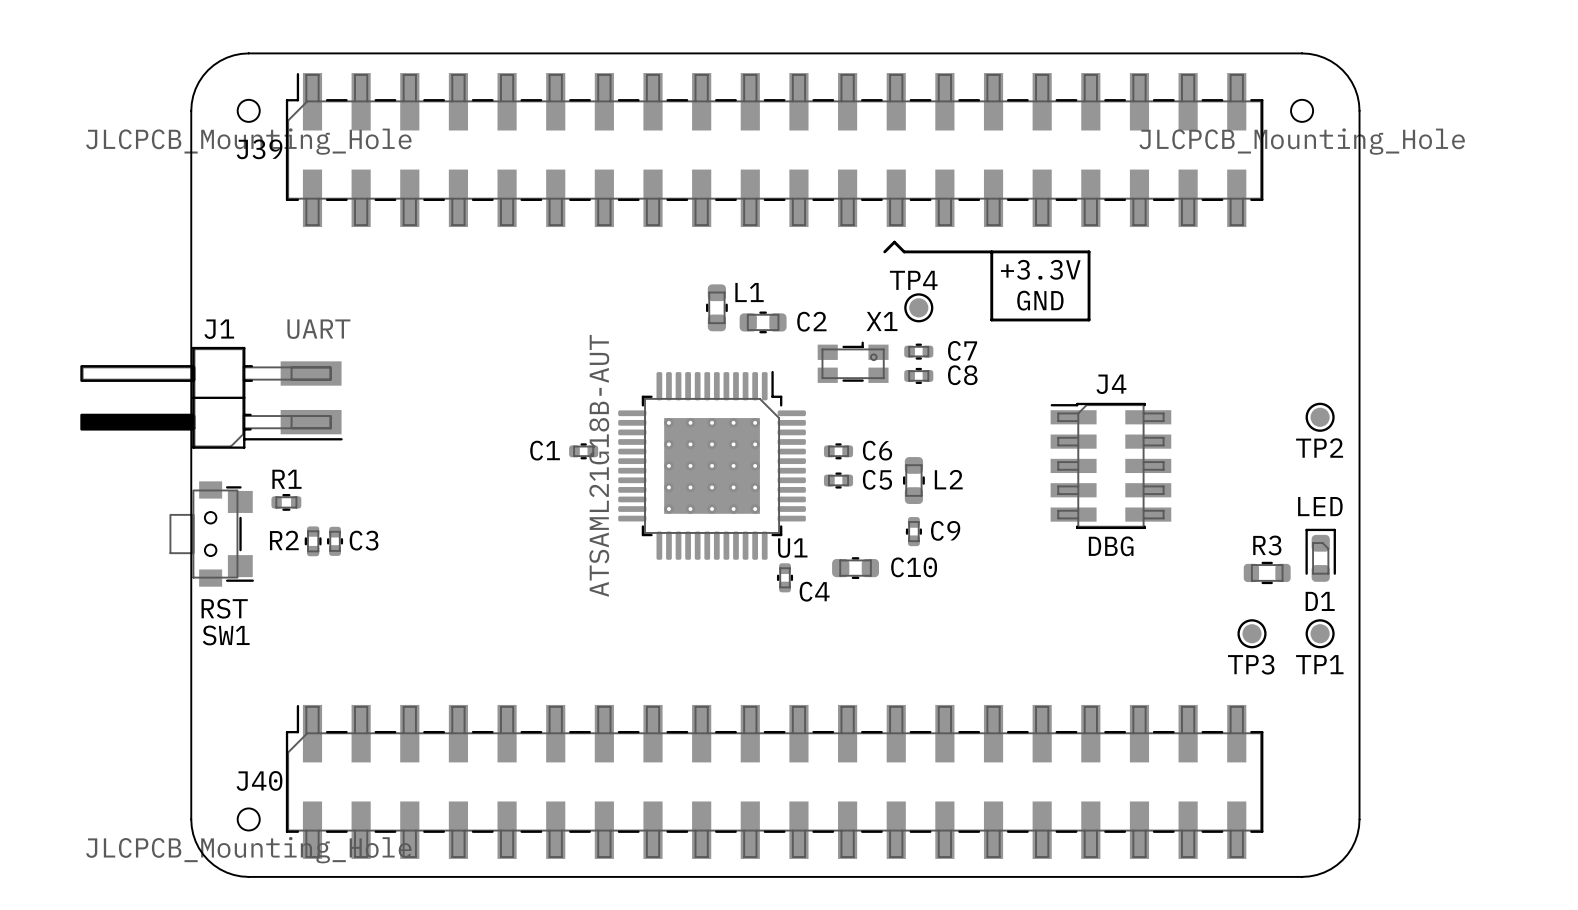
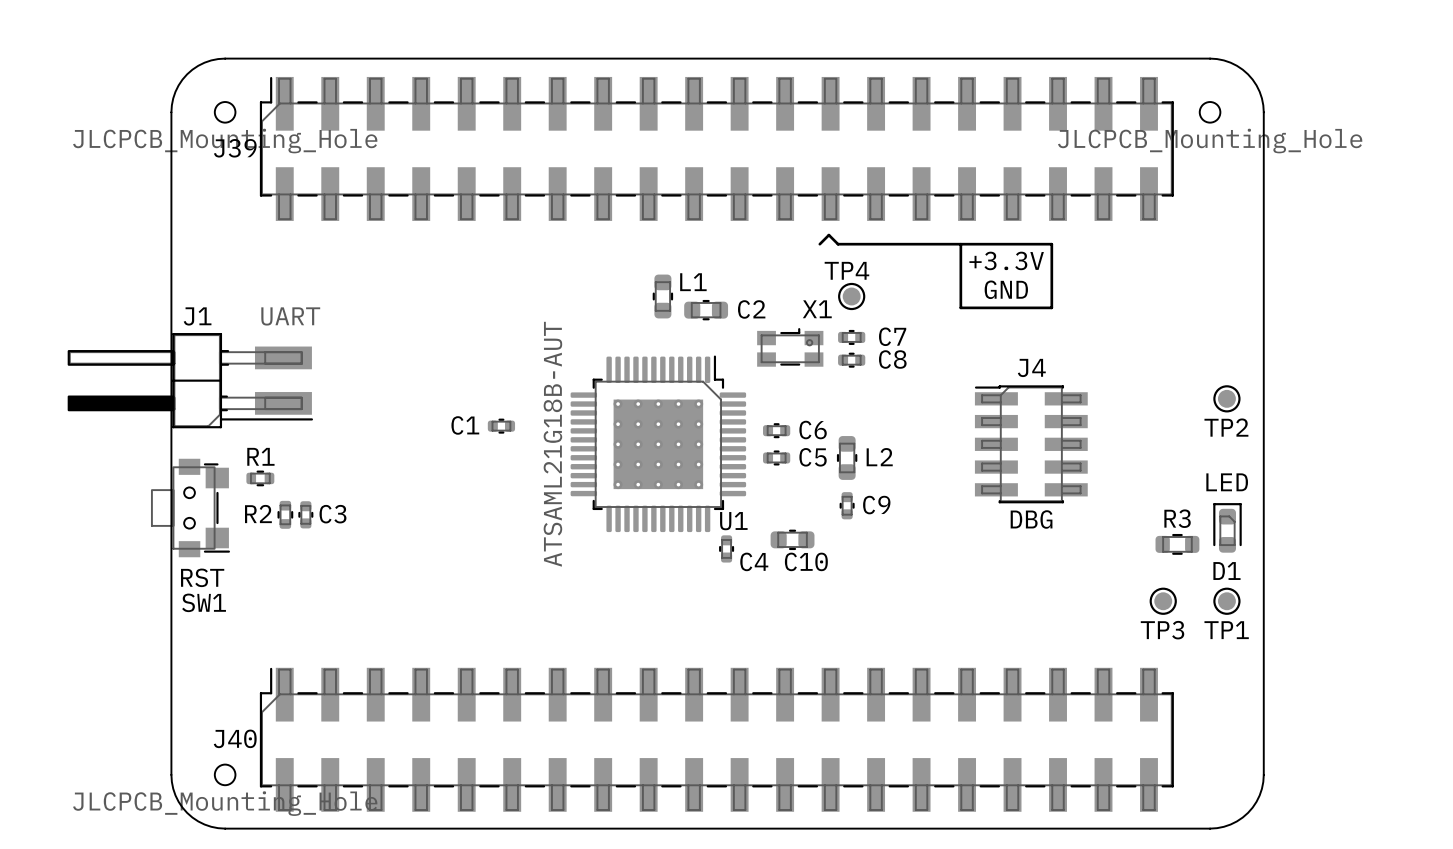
line: (991, 251) (991, 319) (1035, 319) -> (960, 244) (960, 307)
line: (1089, 251) (1089, 319) -> (1010, 244) (1051, 244) (1051, 307) (1010, 307)
text position: +3.3V (1040, 269) -> +3.3V (1006, 260)
text position: GND (1040, 300) -> GND (1006, 289)
C1 position: (583, 451) -> (501, 426)
C10 name position: C10 (914, 567) -> C10 (806, 561)

